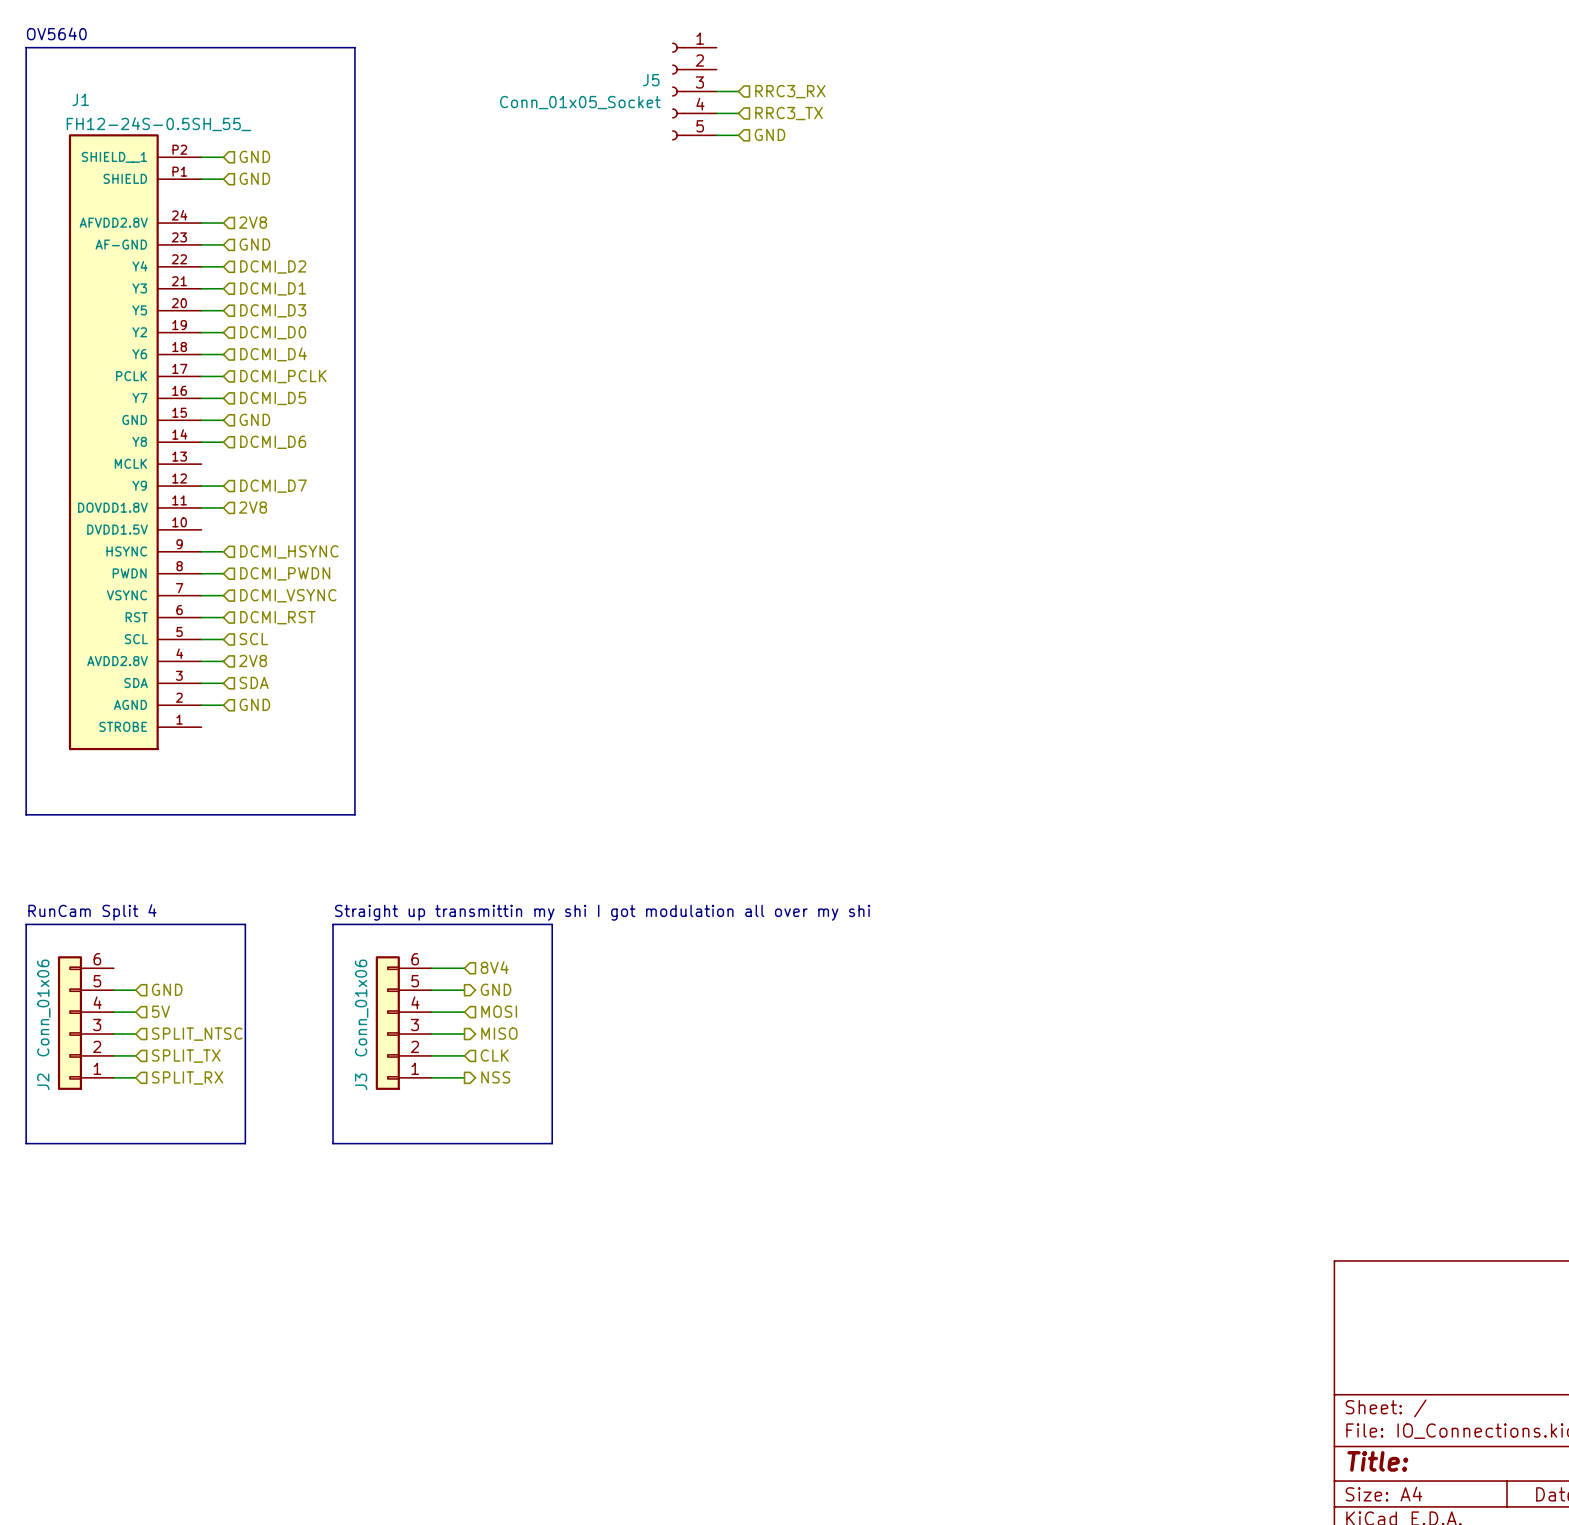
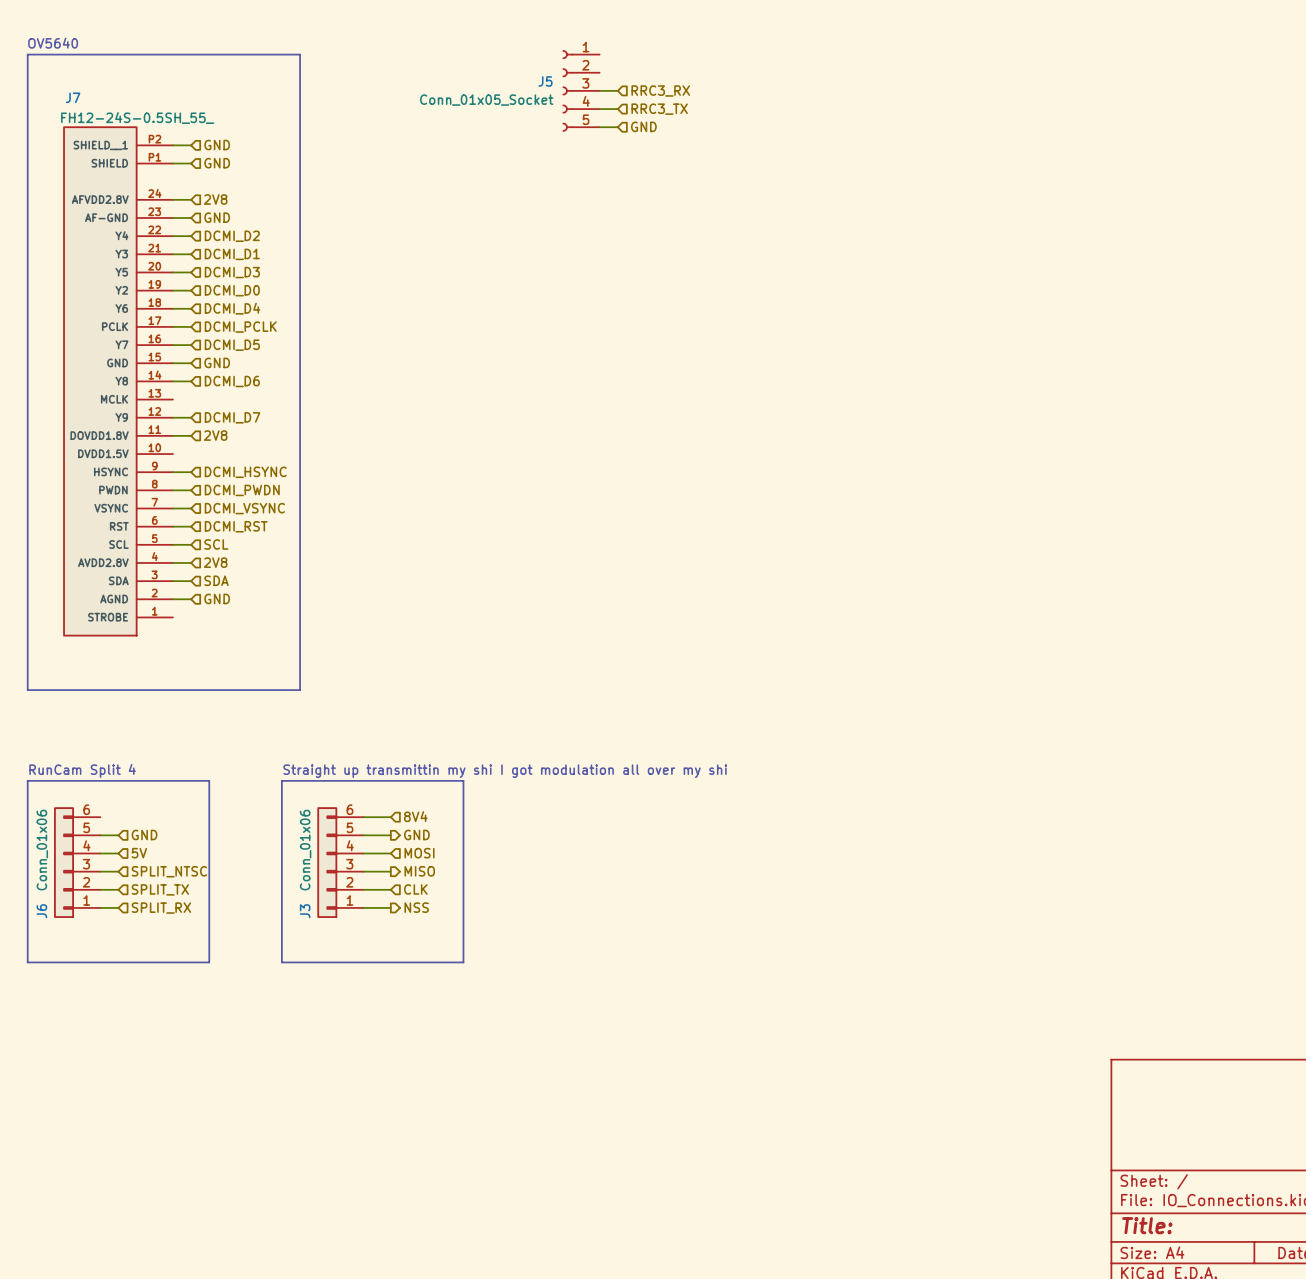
J1 name: J1 (80, 99) -> J7 (73, 97)
J2 name: J2 (43, 1081) -> J6 (41, 911)

